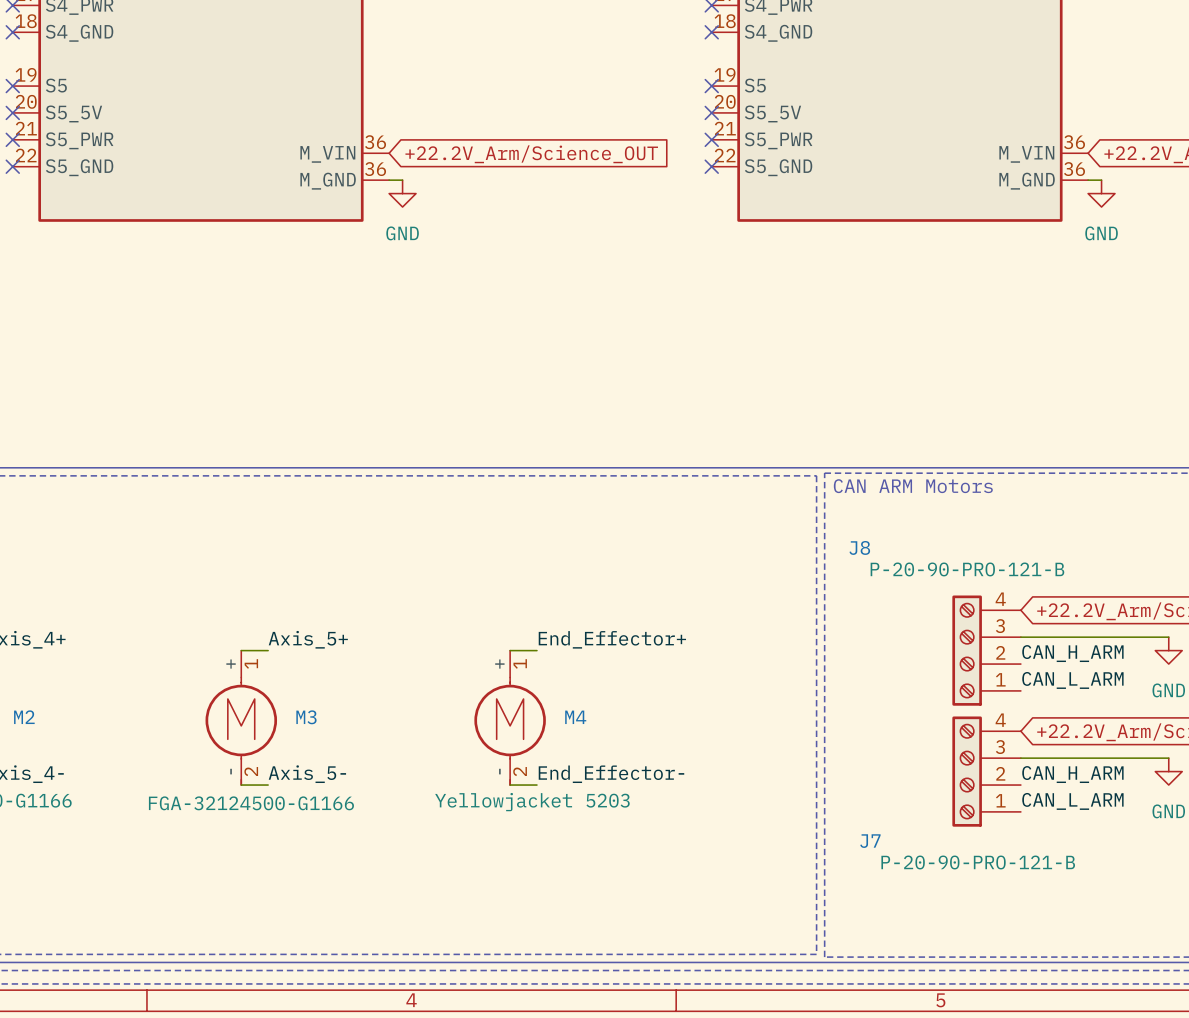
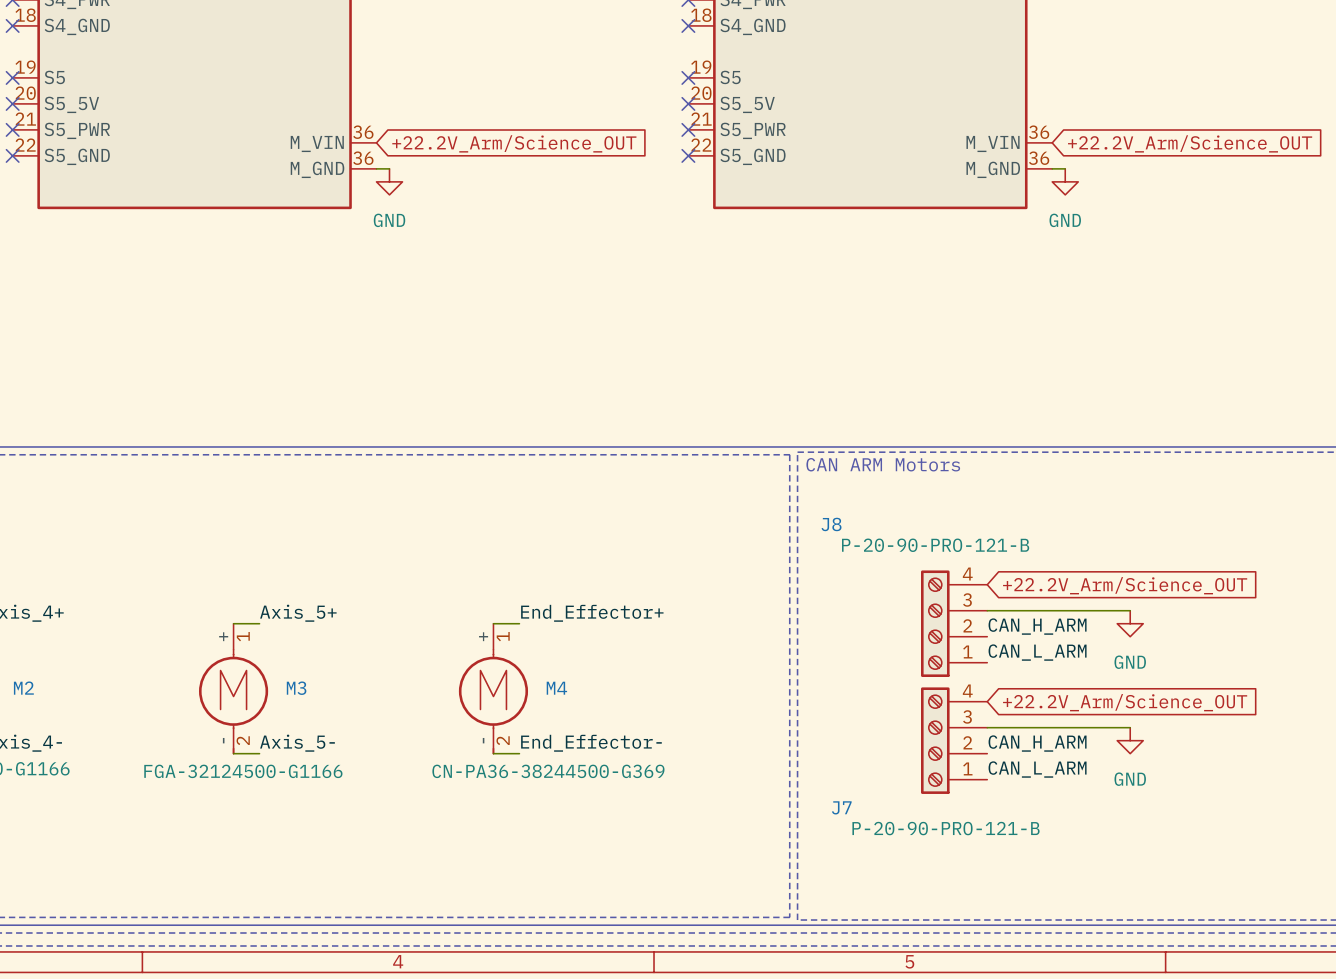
M4 value: Yellowjacket 5203 (532, 802) -> CN-PA36-38244500-G369 (548, 771)

